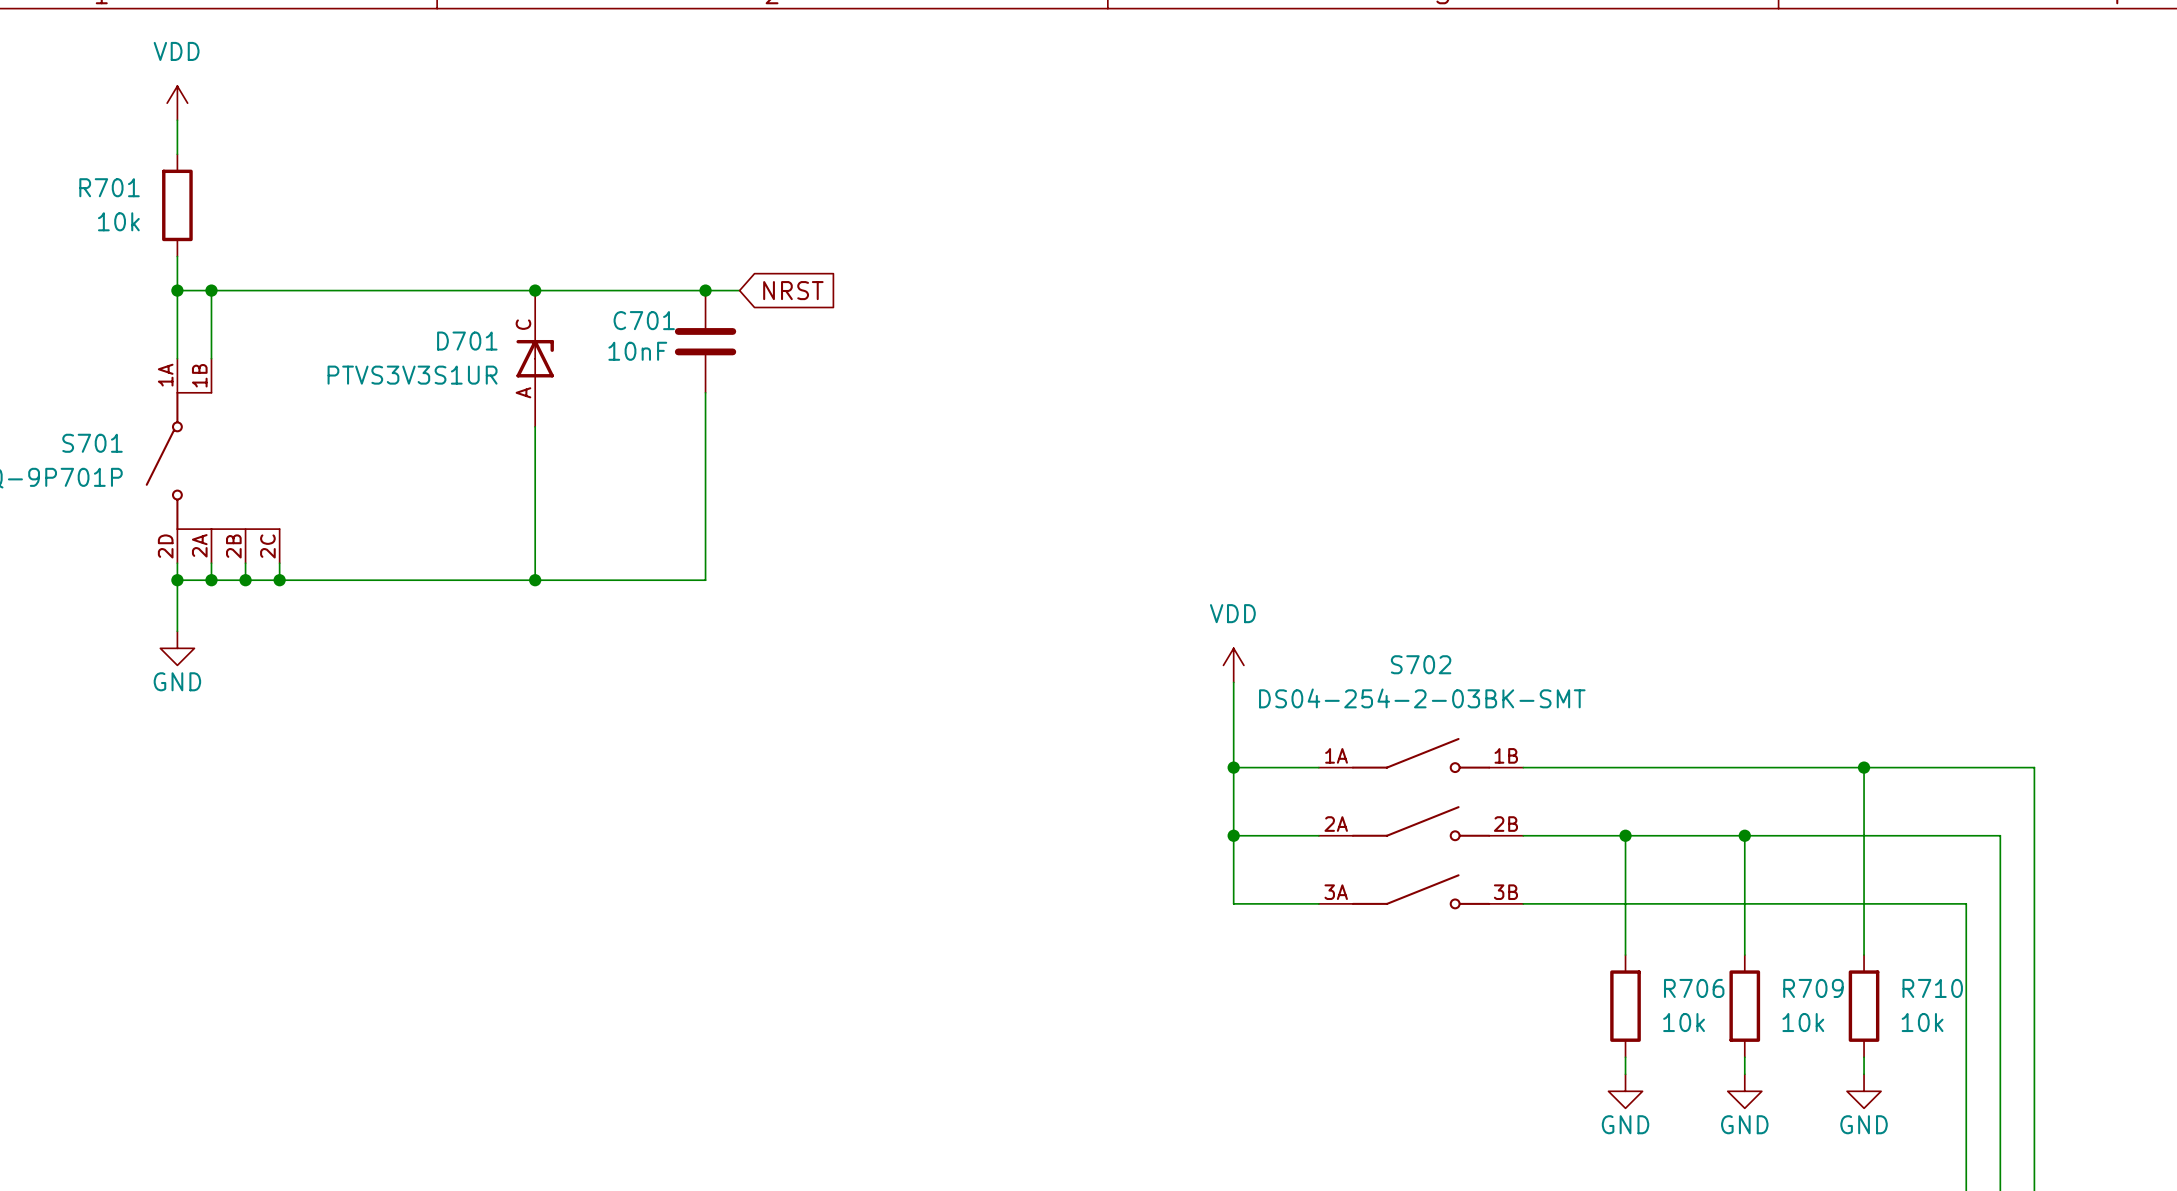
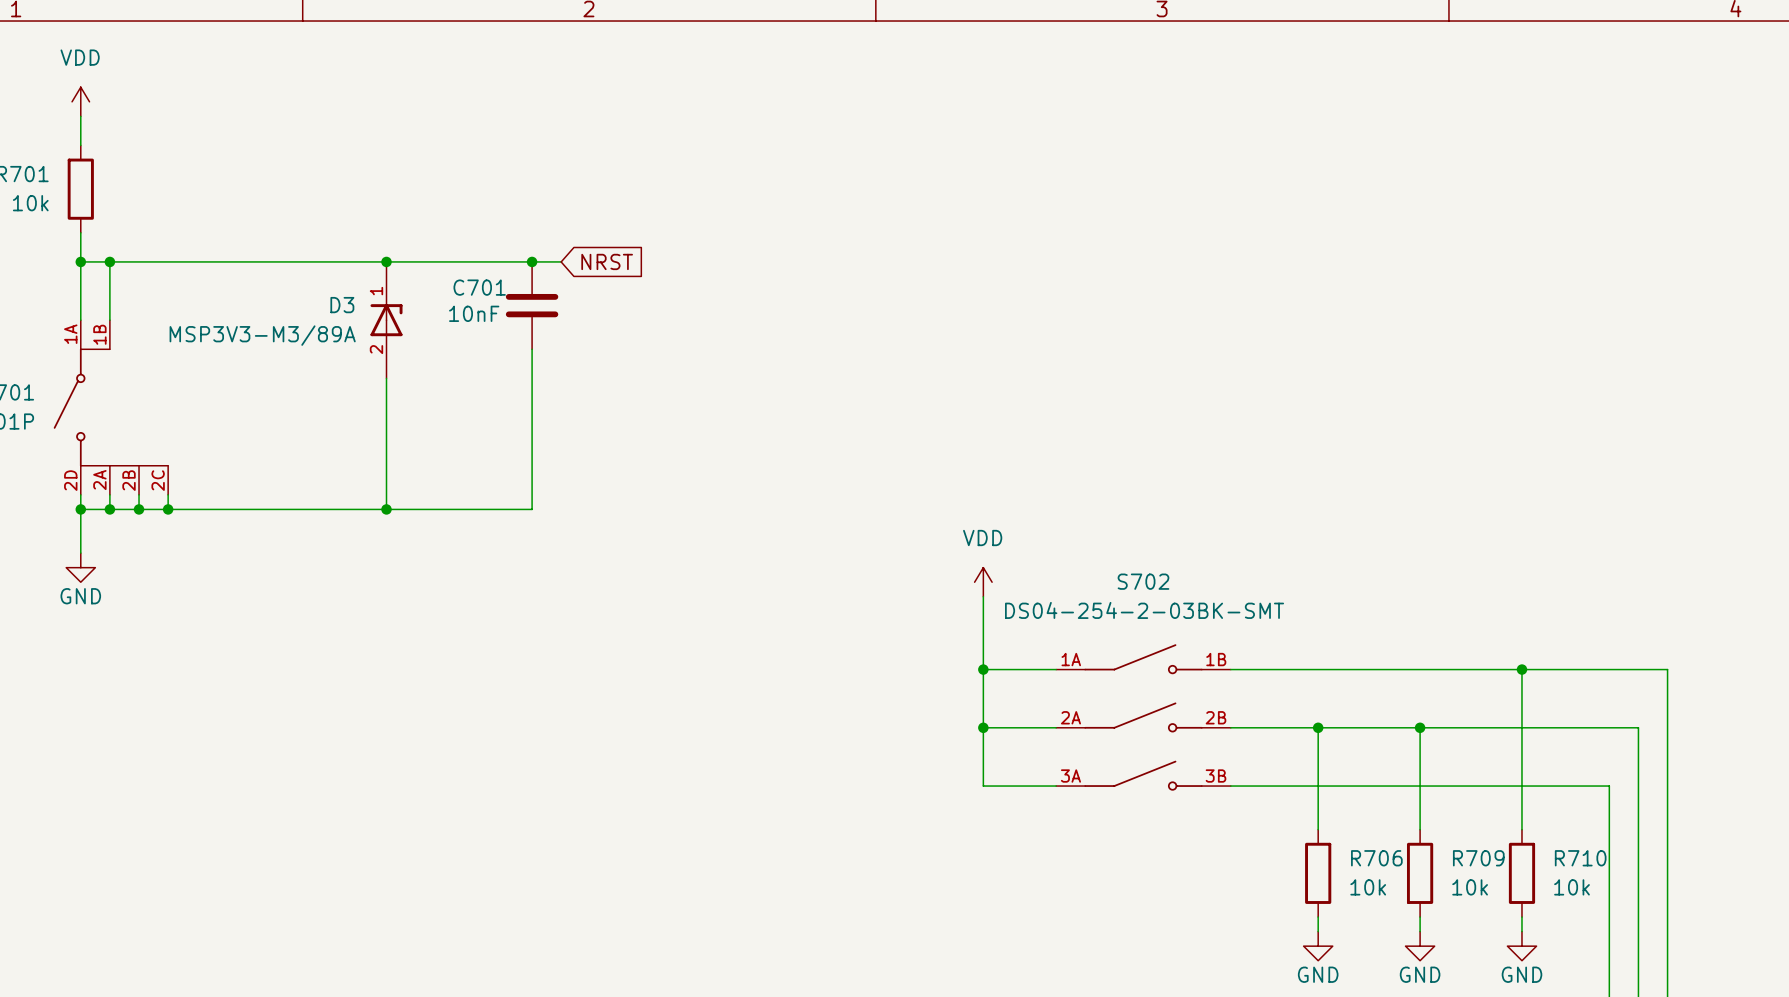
D701 pin number: C (523, 324) -> 1 (376, 291)
D701 name: D701 (467, 341) -> D3 (342, 305)
D701 value: PTVS3V3S1UR (412, 375) -> MSP3V3-M3/89A (262, 335)
D701 pin number: A (523, 392) -> 2 (376, 349)

